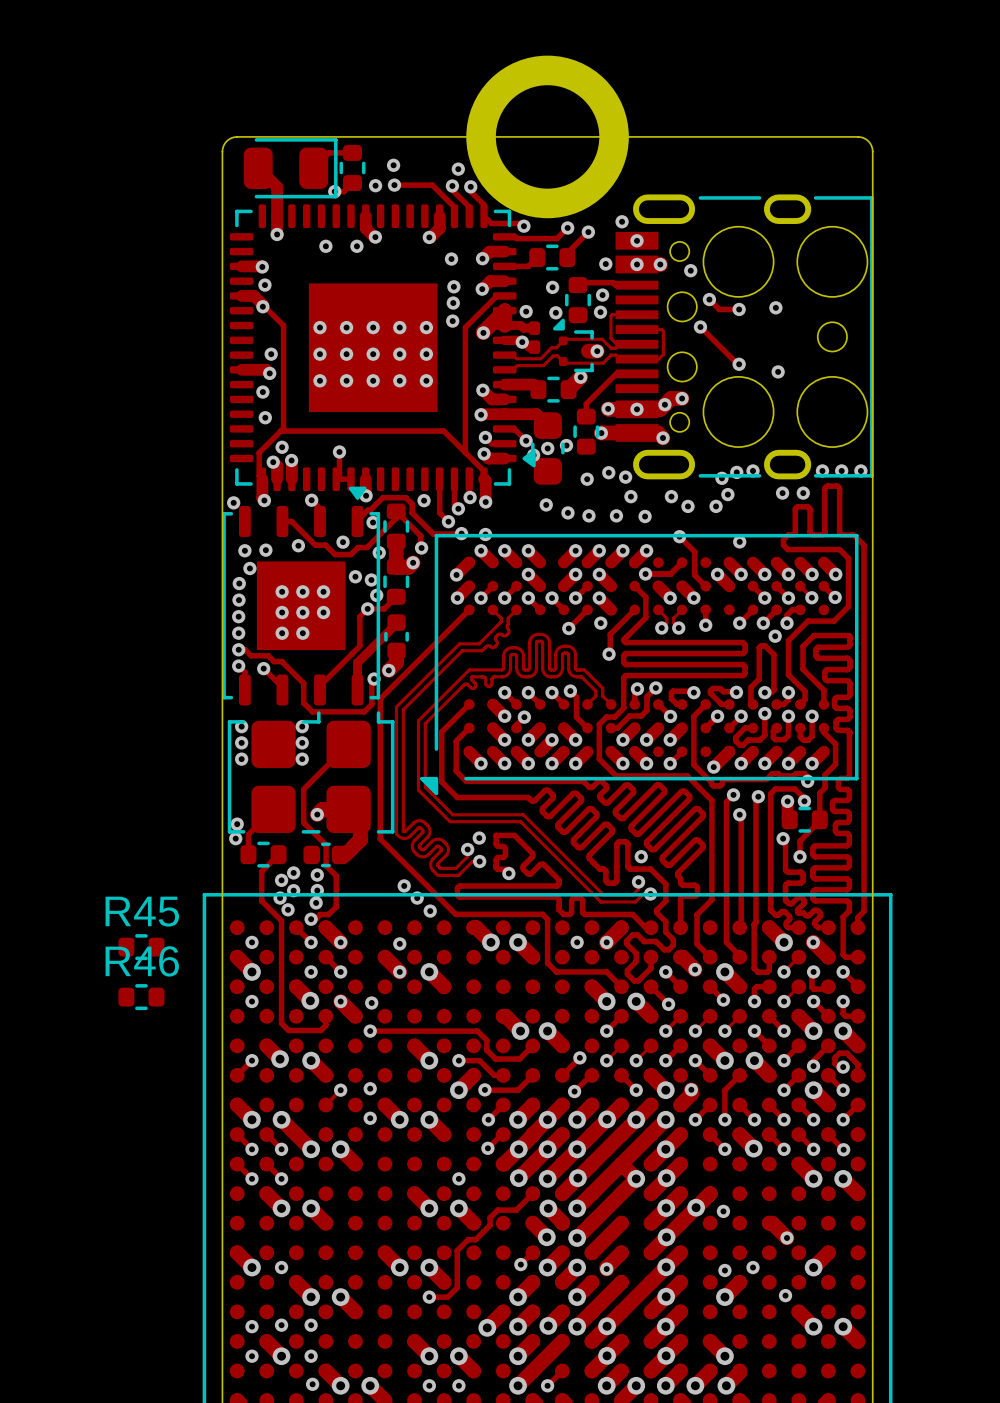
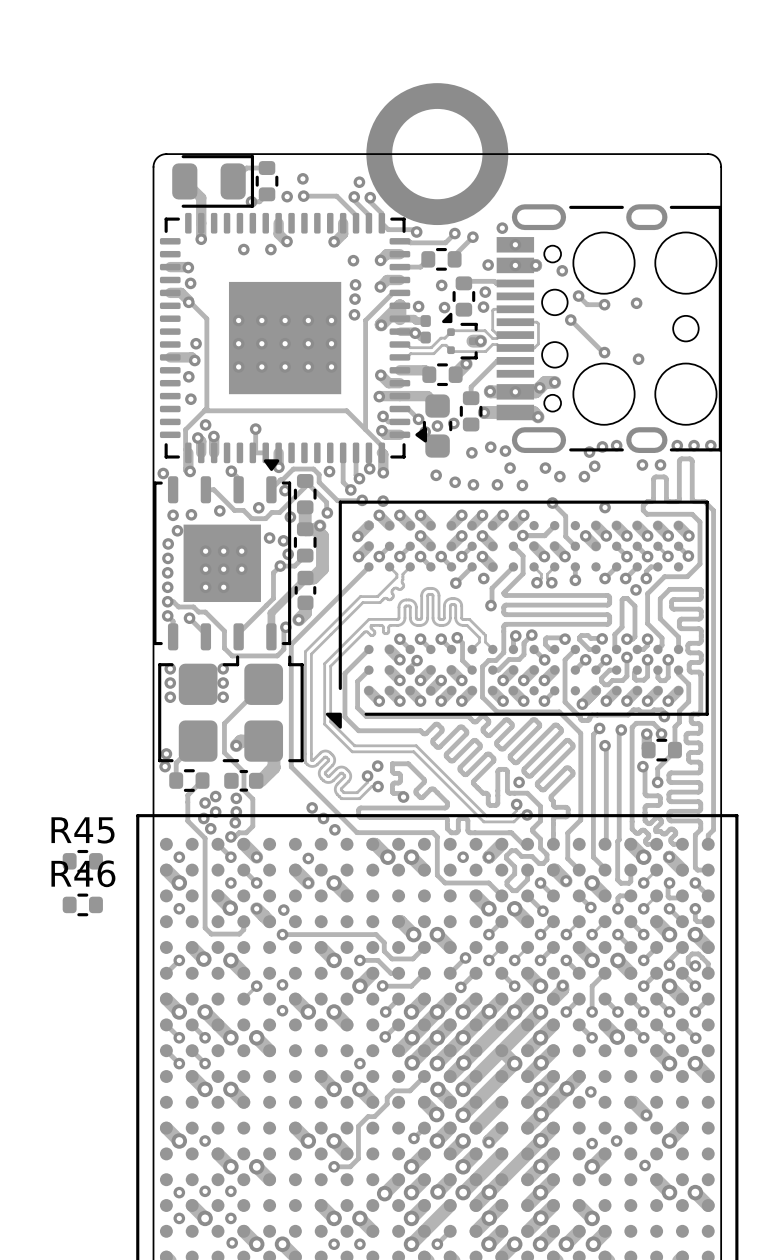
track: none -> (316, 529) (322, 536) (322, 568) (313, 578) (305, 578)

